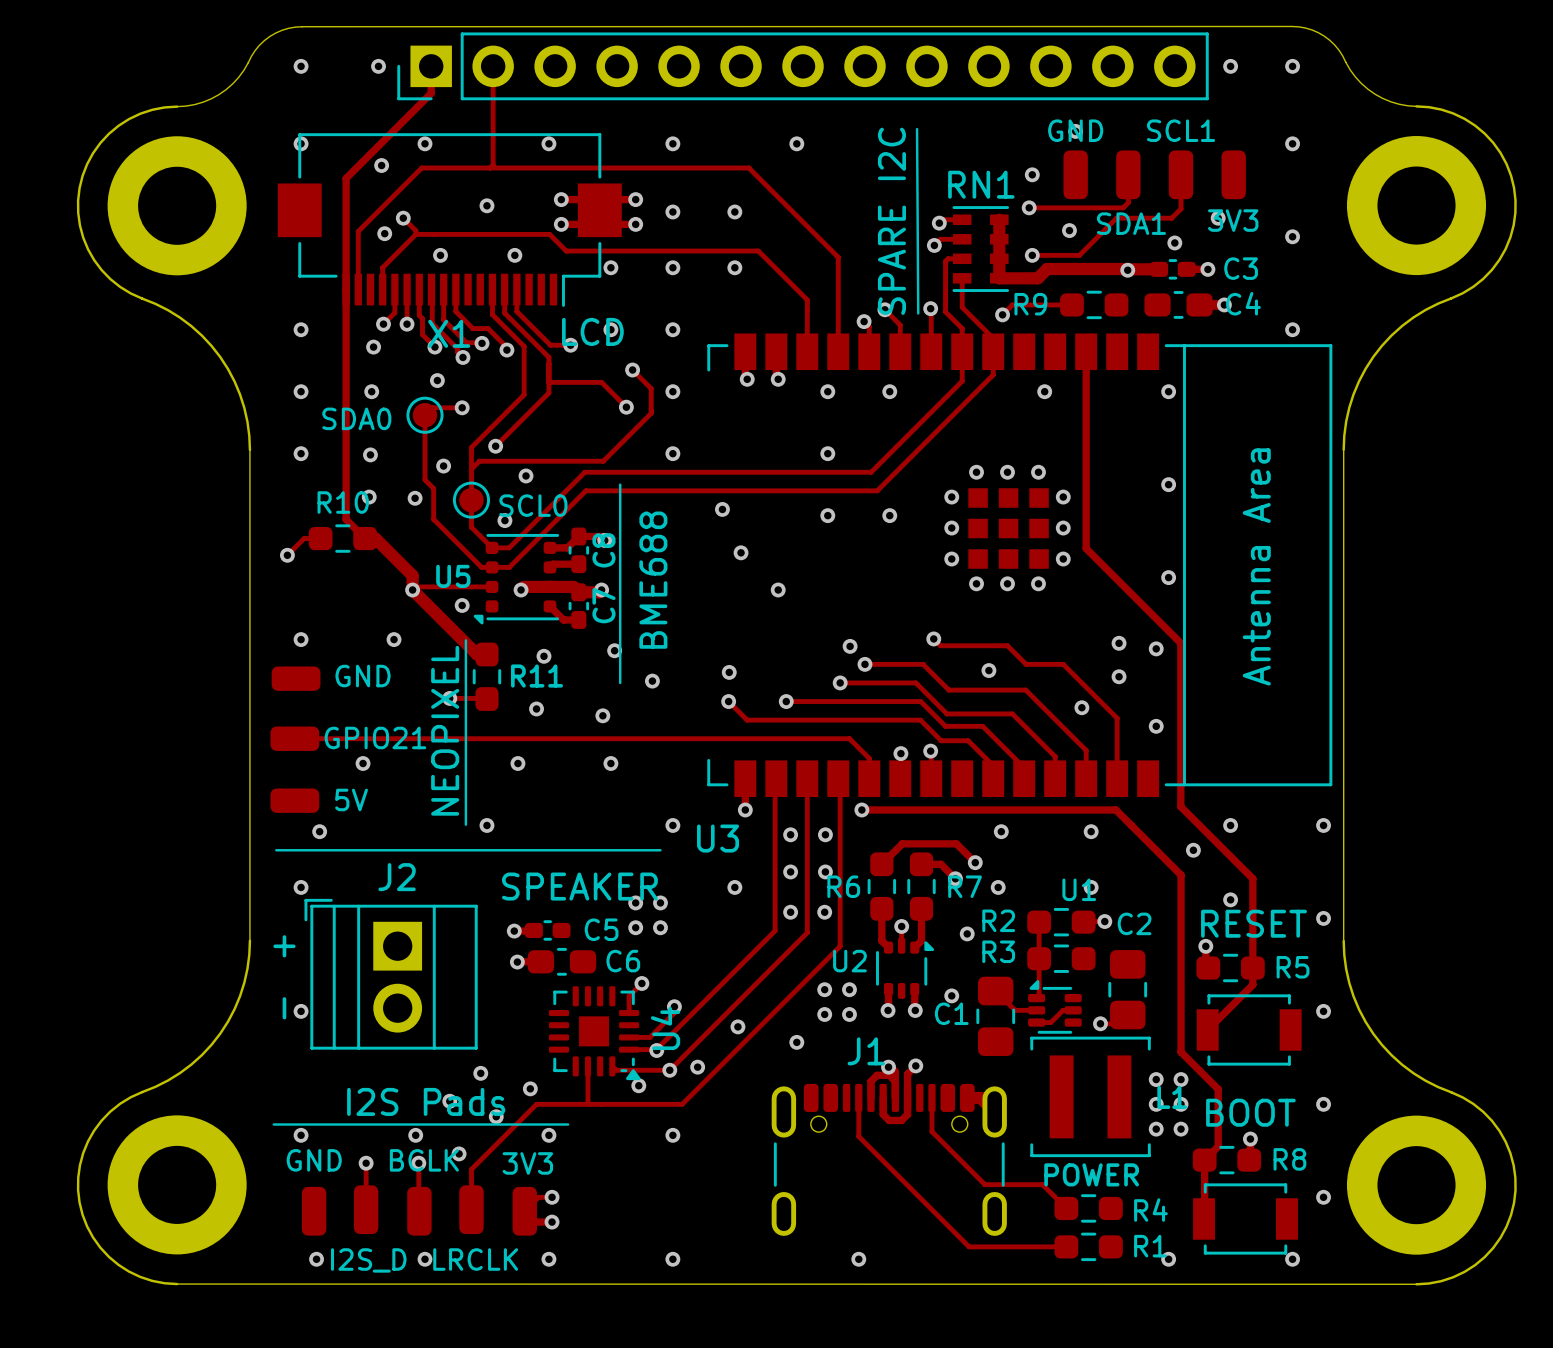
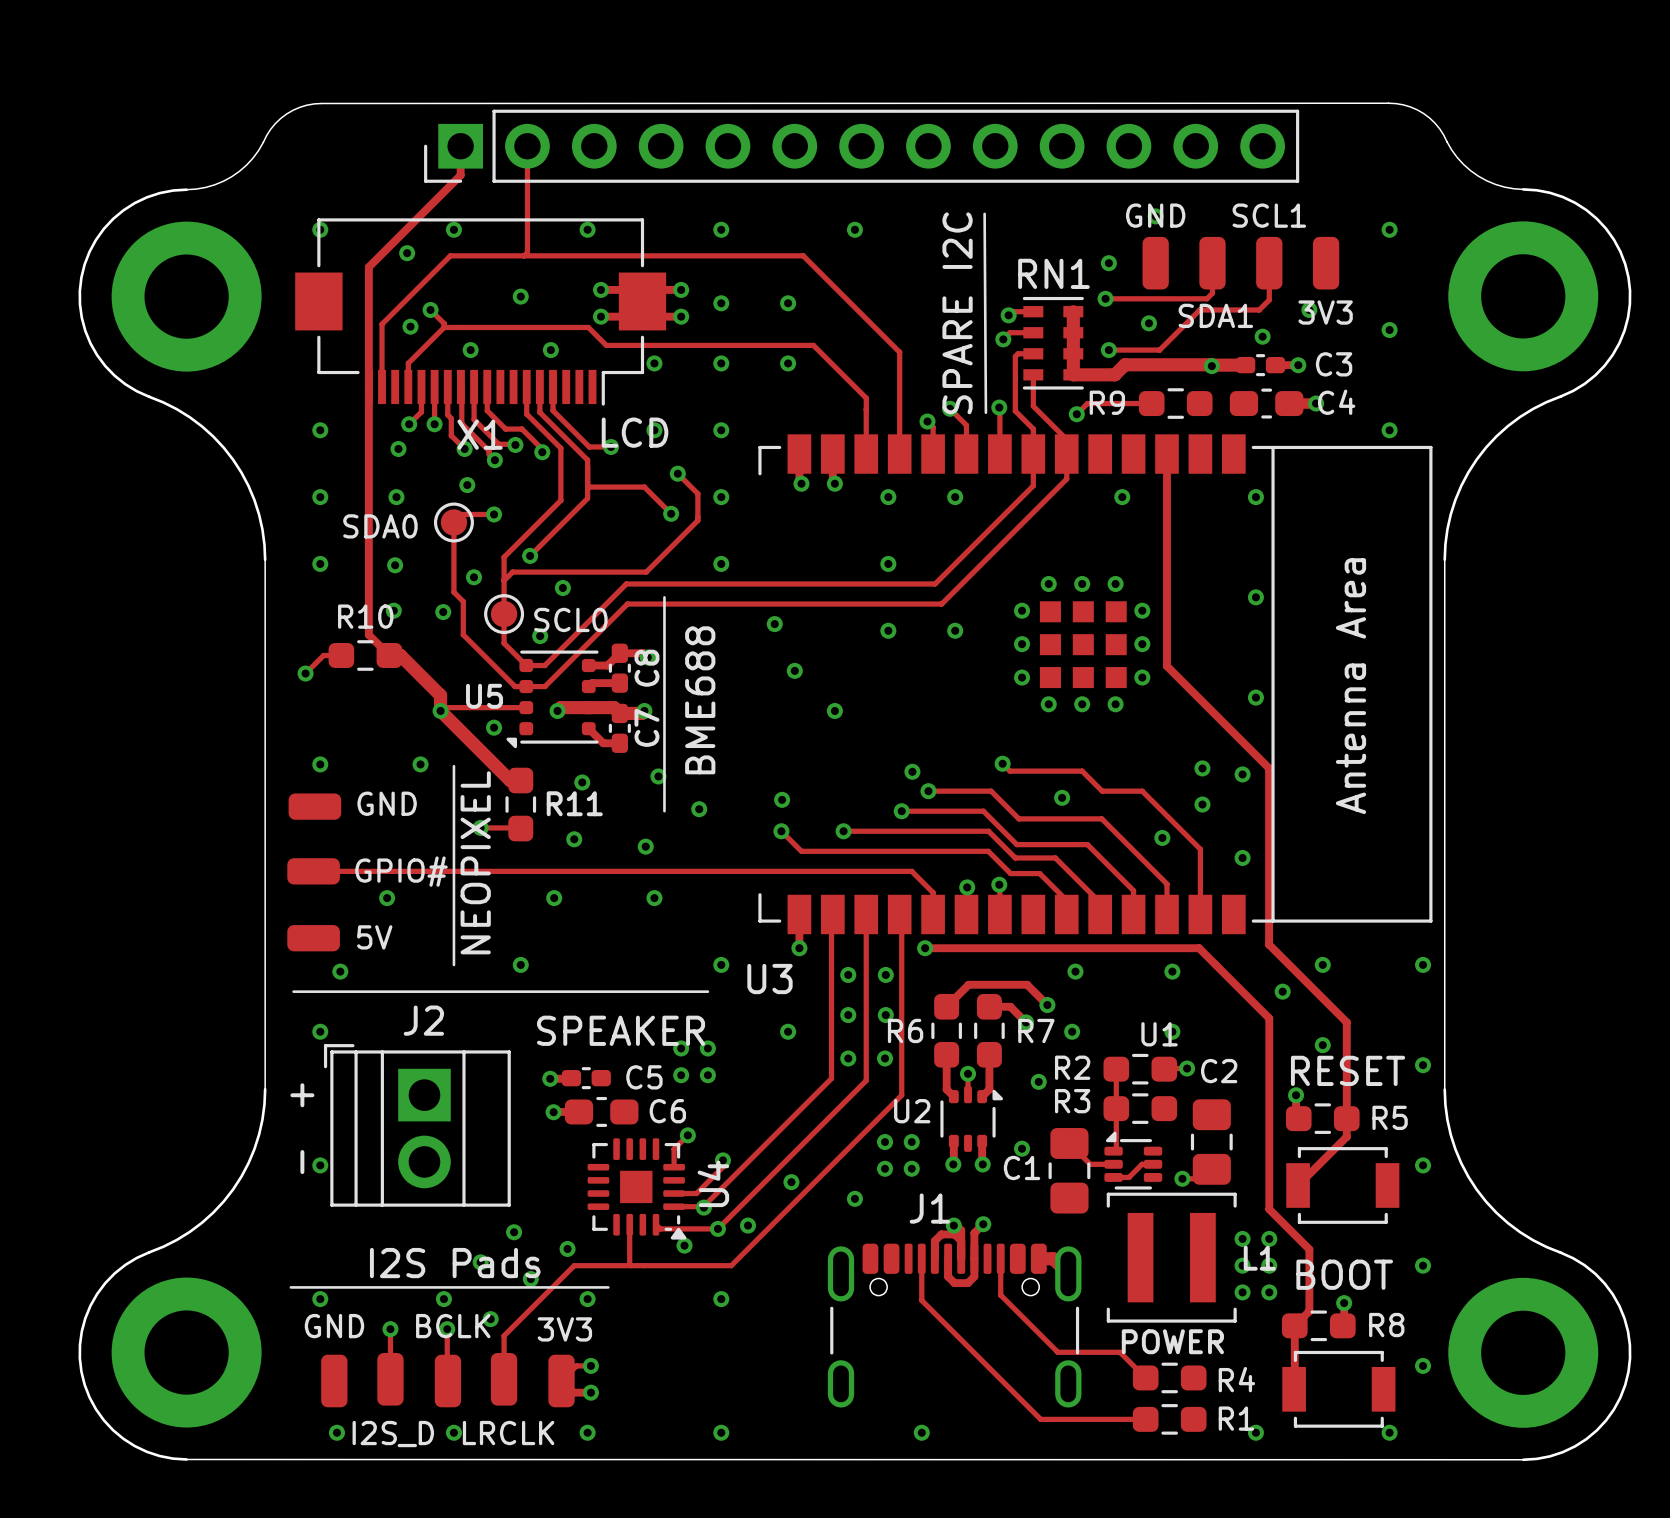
via: (301, 66) -> none
via: (378, 66) -> none
via: (1230, 66) -> none
via: (1292, 66) -> none
line: (465, 640) (465, 824) -> (453, 766) (453, 965)
text: GPIO21 (375, 737) -> GPIO# (401, 871)

